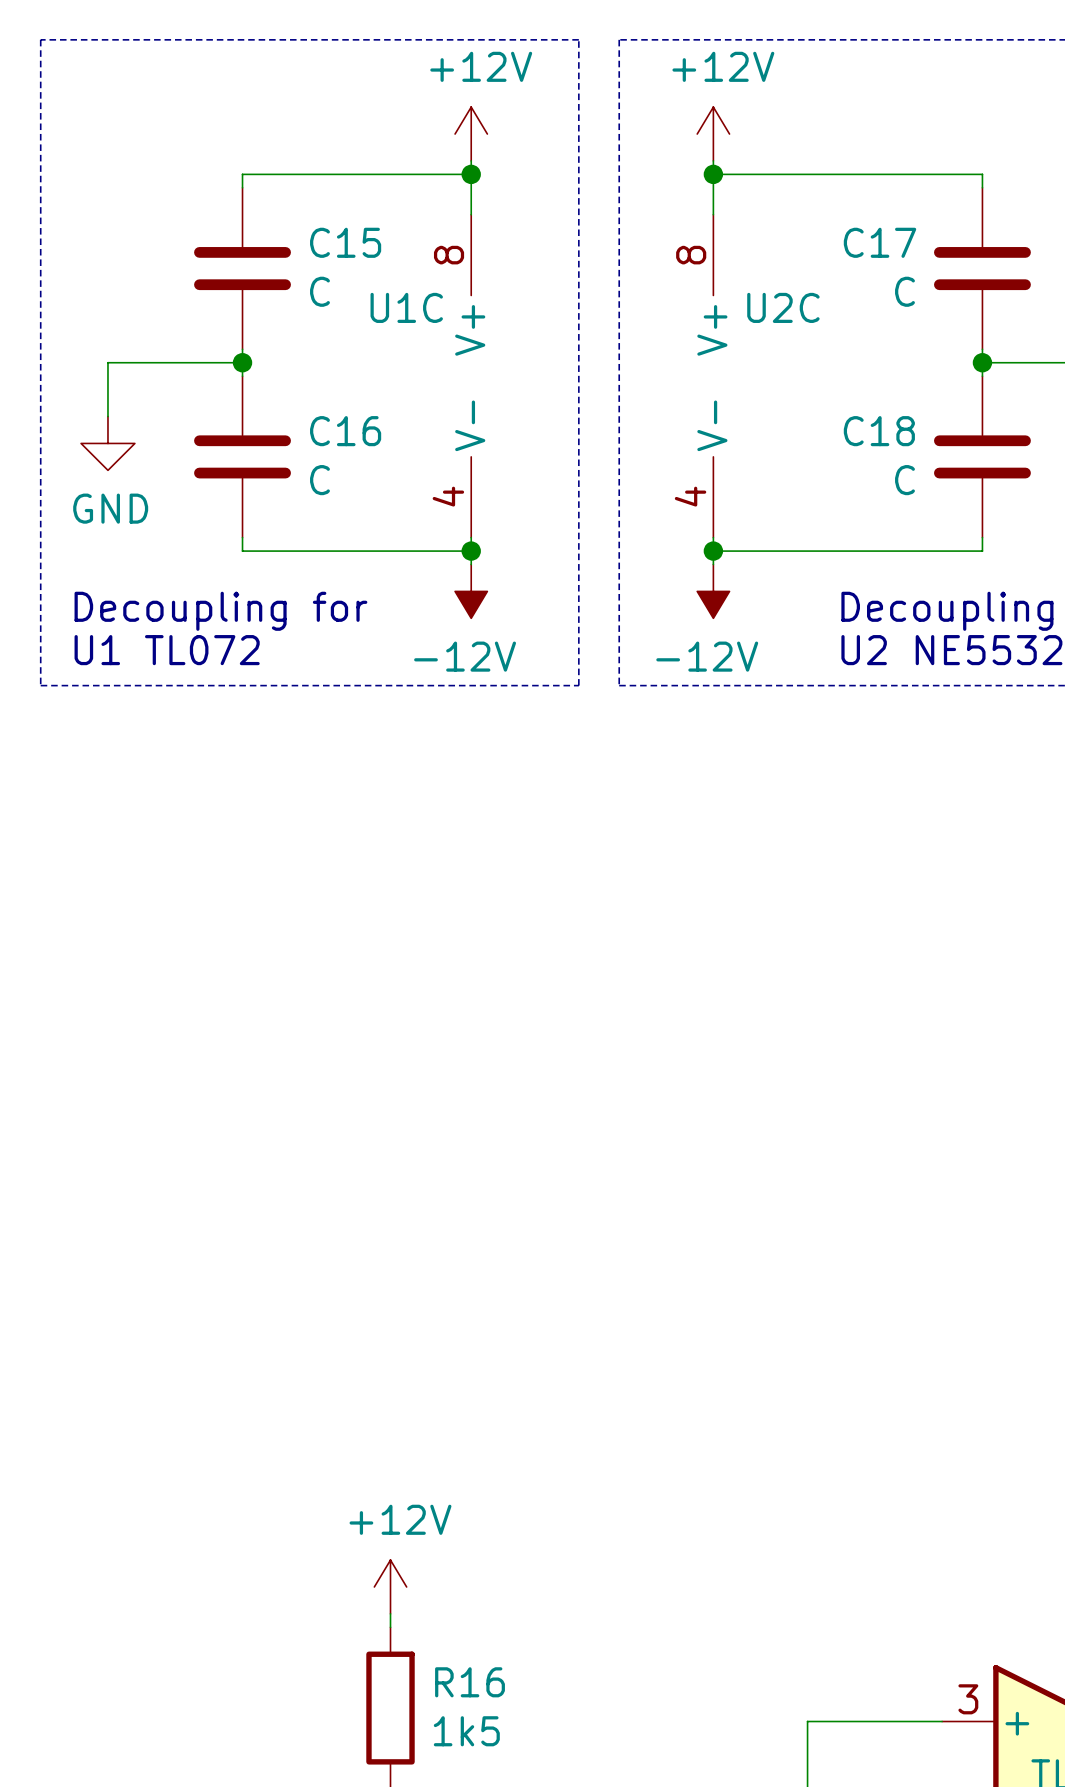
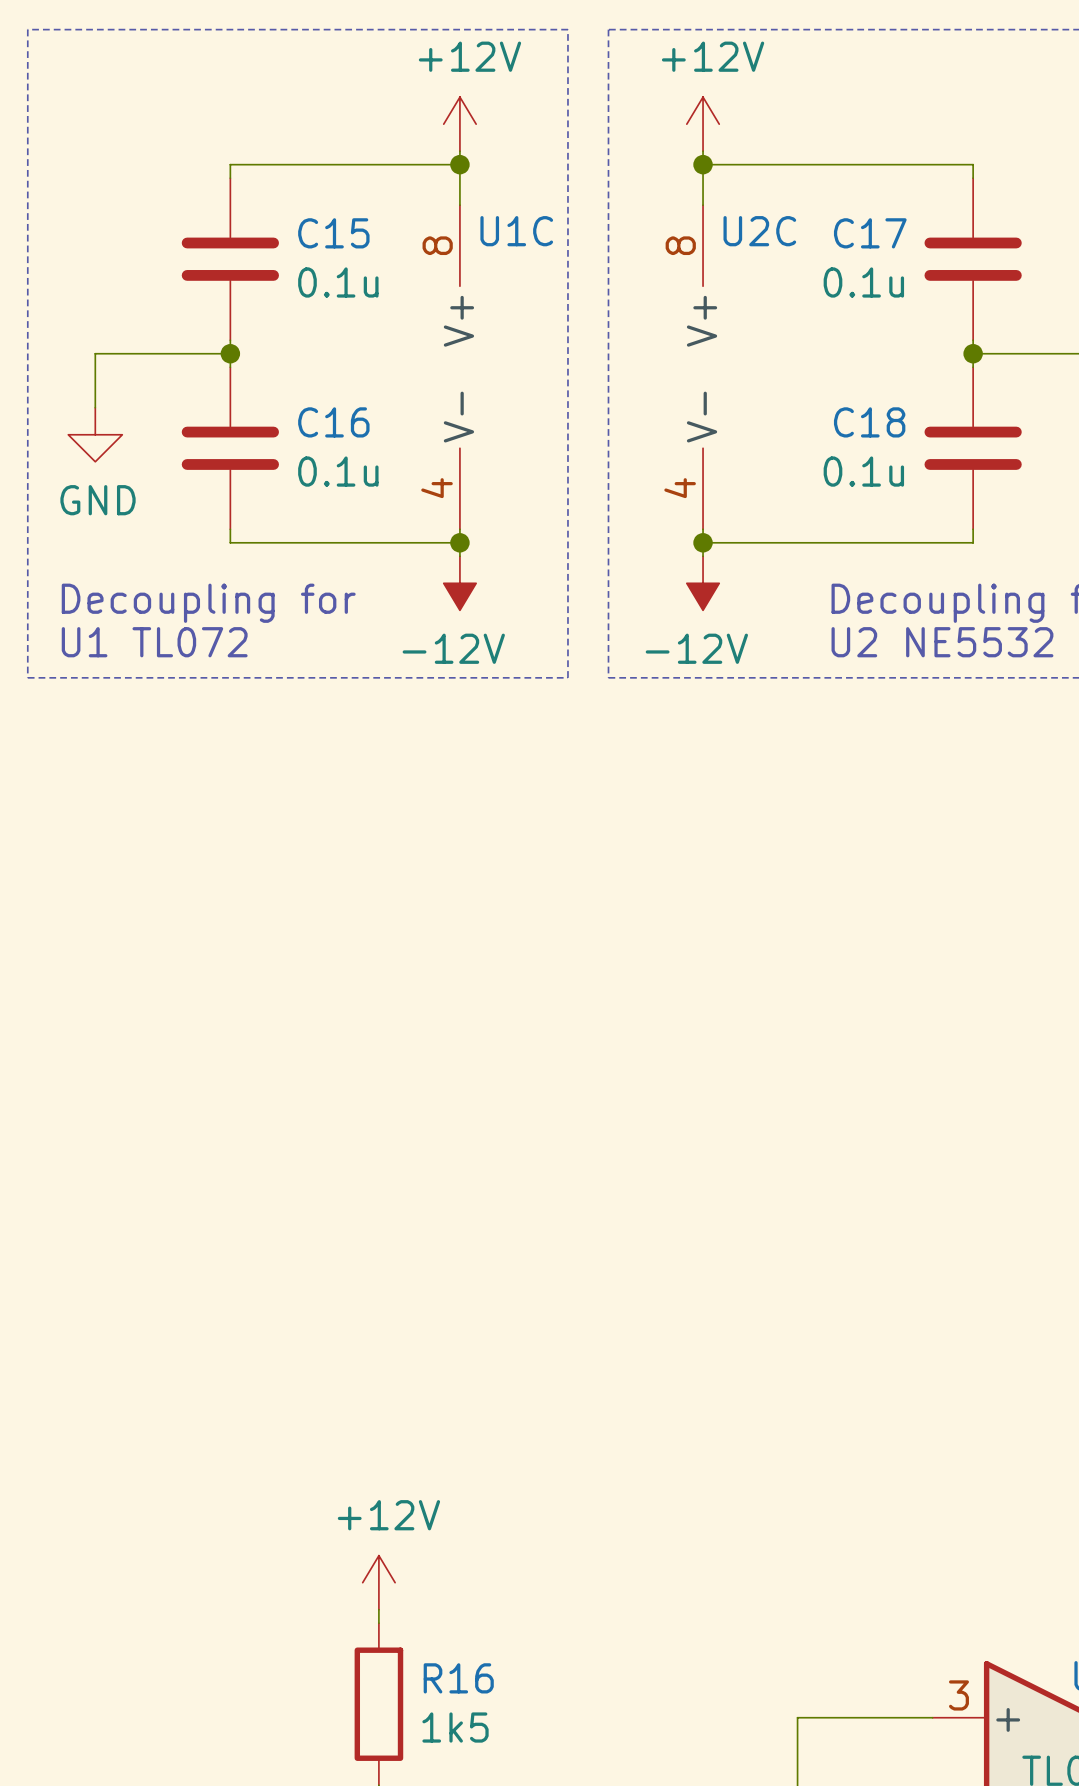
C15 value: C (319, 291) -> 0.1u (338, 282)
C17 value: C (904, 291) -> 0.1u (863, 282)
U1C name position: U1C (406, 307) -> U1C (516, 231)
U2C name position: U2C (783, 307) -> U2C (759, 231)
C16 value: C (319, 480) -> 0.1u (338, 471)
C18 value: C (904, 480) -> 0.1u (863, 471)

